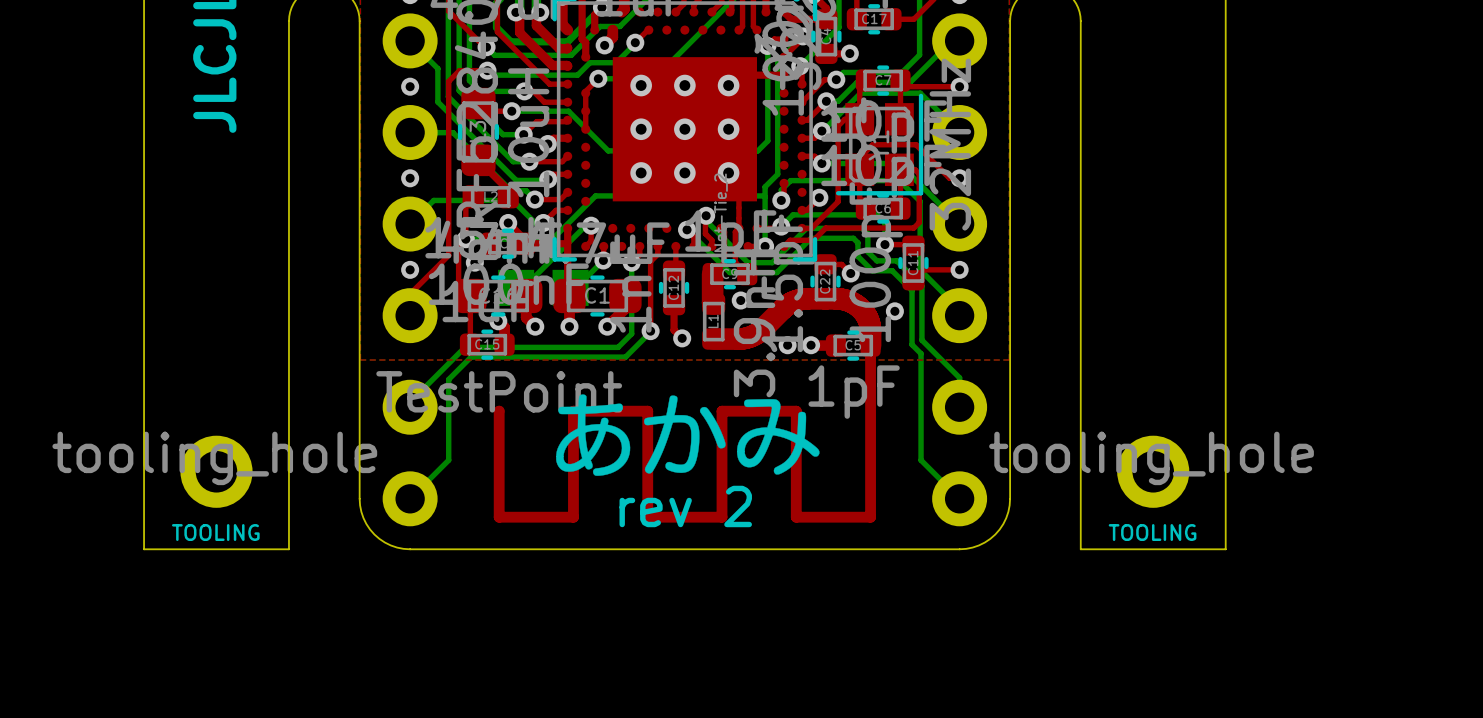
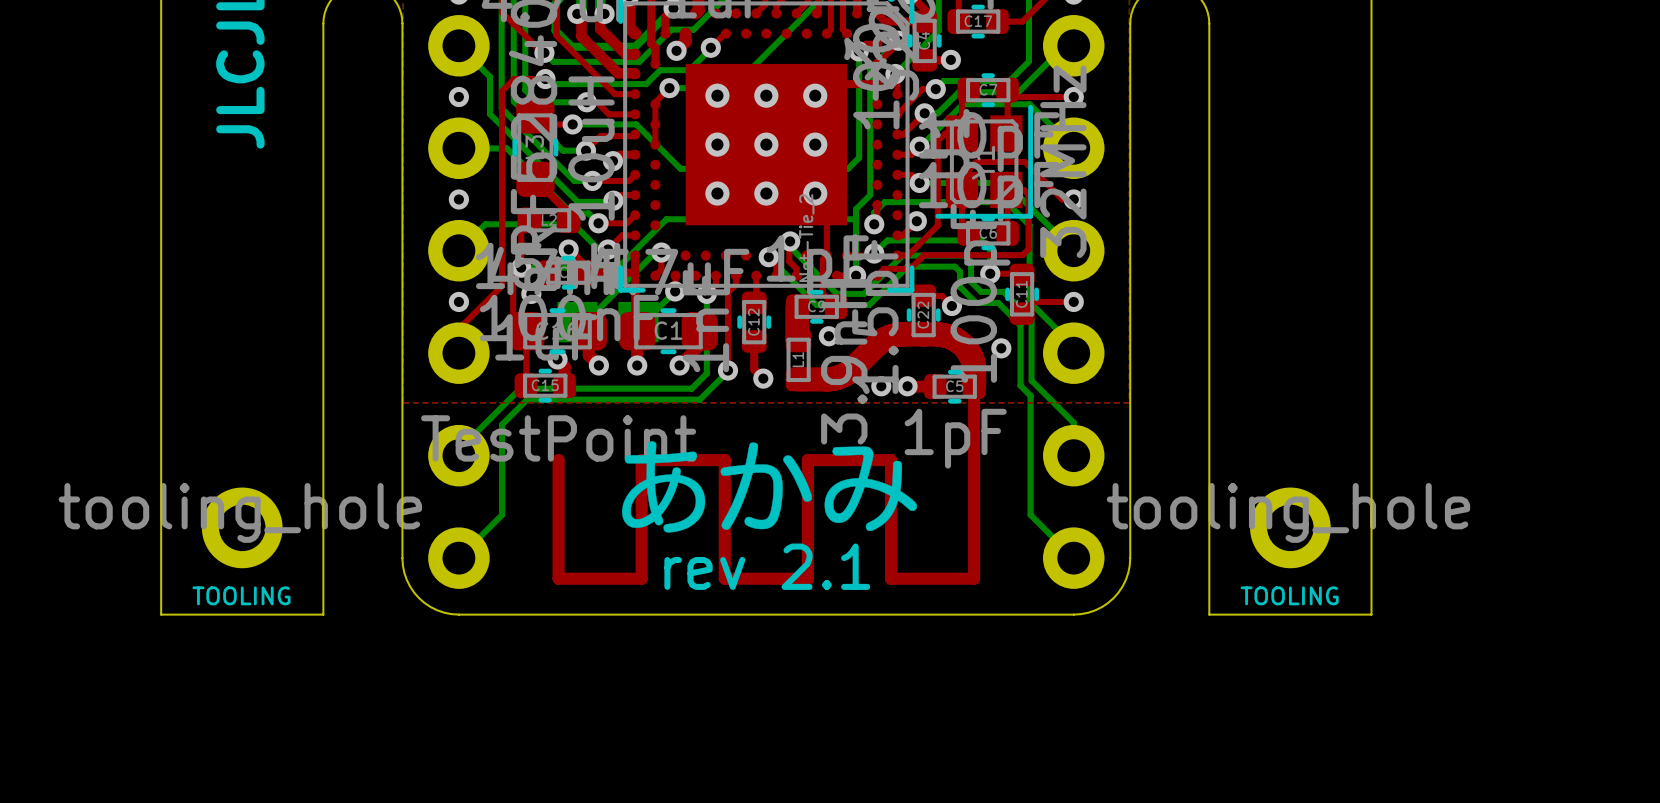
text: rev 2 (685, 506) -> rev 2.1 (767, 566)

